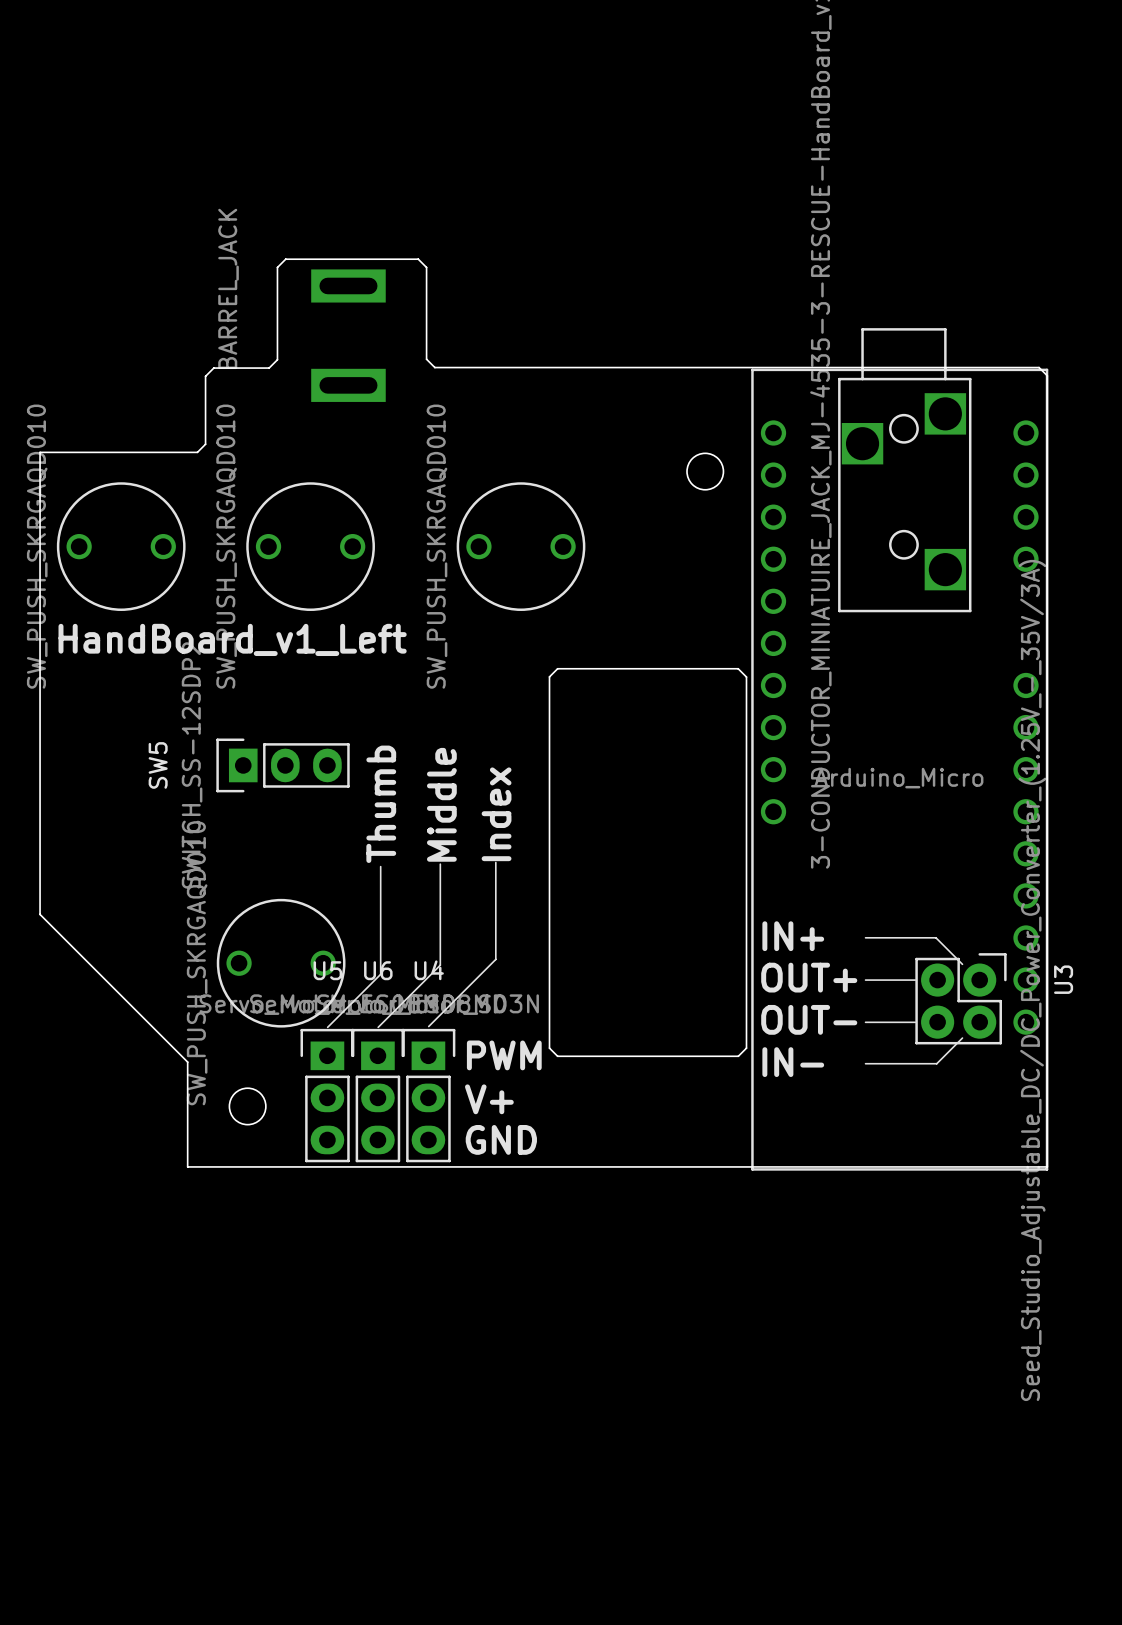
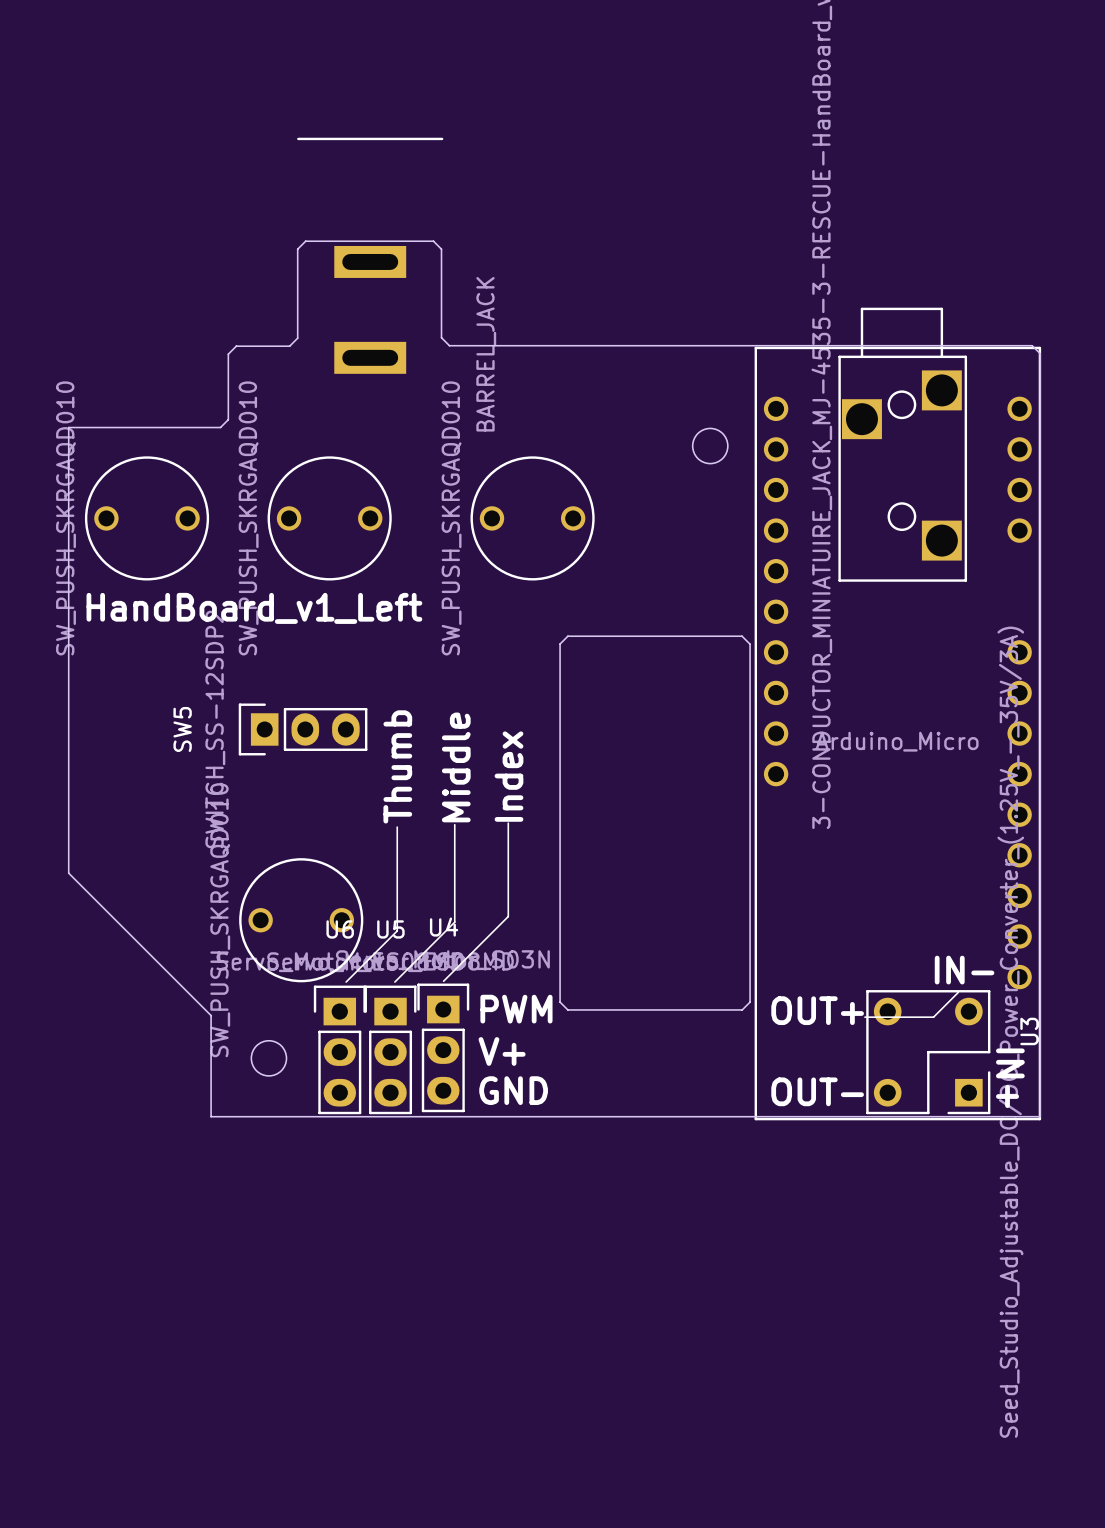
part: none -> BARREL_JACK (370, 255)
part: BARREL_JACK (348, 335) -> none
text rotation: 0° (793, 936) -> 90° clockwise (1010, 1078)
text position: IN+ (793, 936) -> IN+ (1010, 1078)
line: (865, 937) (935, 937) (962, 964) -> none
U3 footprint: [915, 953, 1007, 1045] -> [866, 990, 991, 1115]
text position: OUT+ (809, 977) -> OUT+ (817, 1010)
line: (865, 980) (915, 980) -> none
text position: OUT- (809, 1019) -> OUT- (817, 1091)
line: (865, 1022) (915, 1022) -> none
U5 footprint: [300, 1028, 355, 1163] -> [364, 985, 417, 1115]
U6 footprint: [351, 1028, 405, 1163] -> [313, 985, 366, 1115]
text position: IN- (793, 1062) -> IN- (964, 970)

